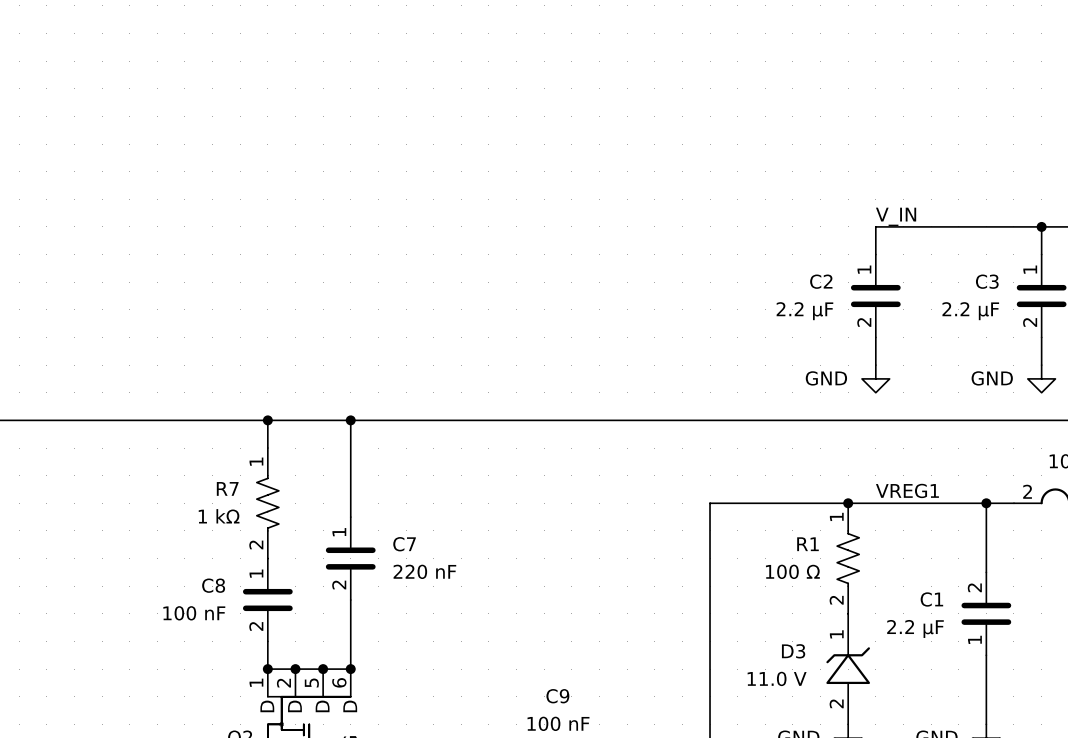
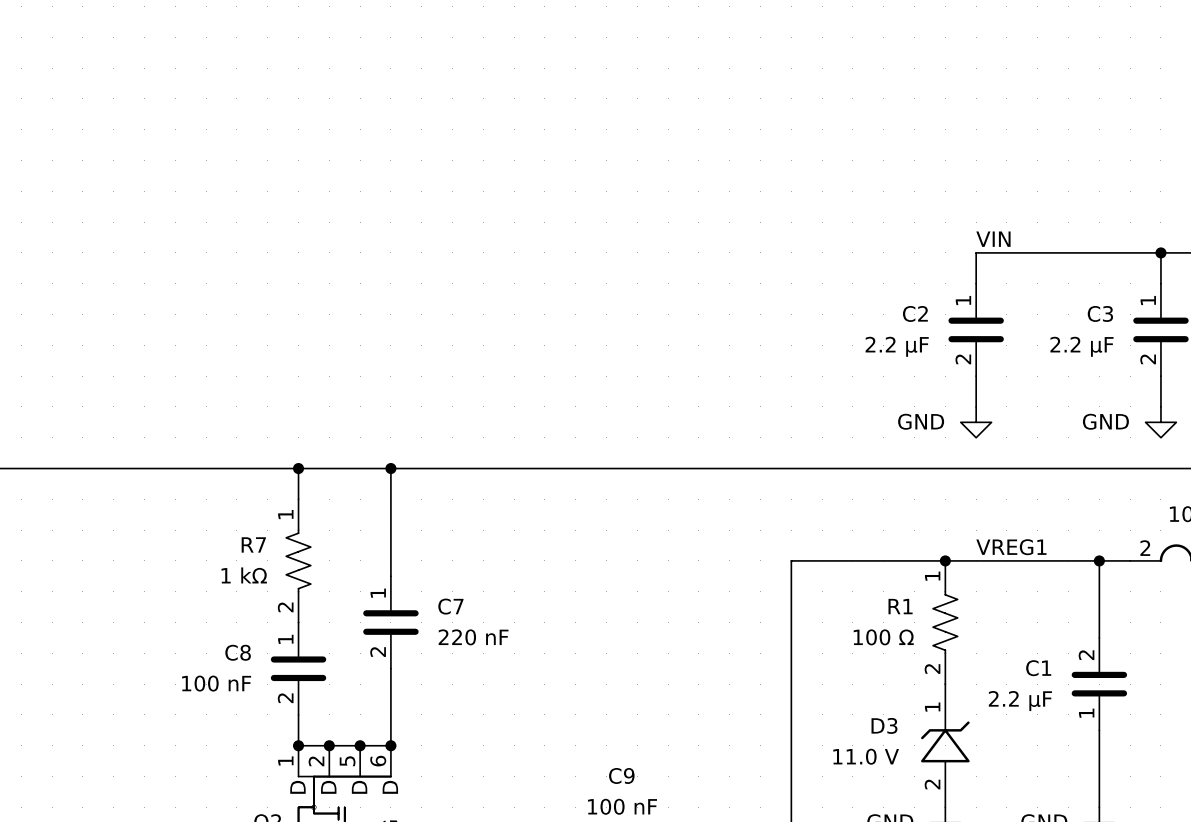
label: V_IN (896, 216) -> VIN (993, 239)

